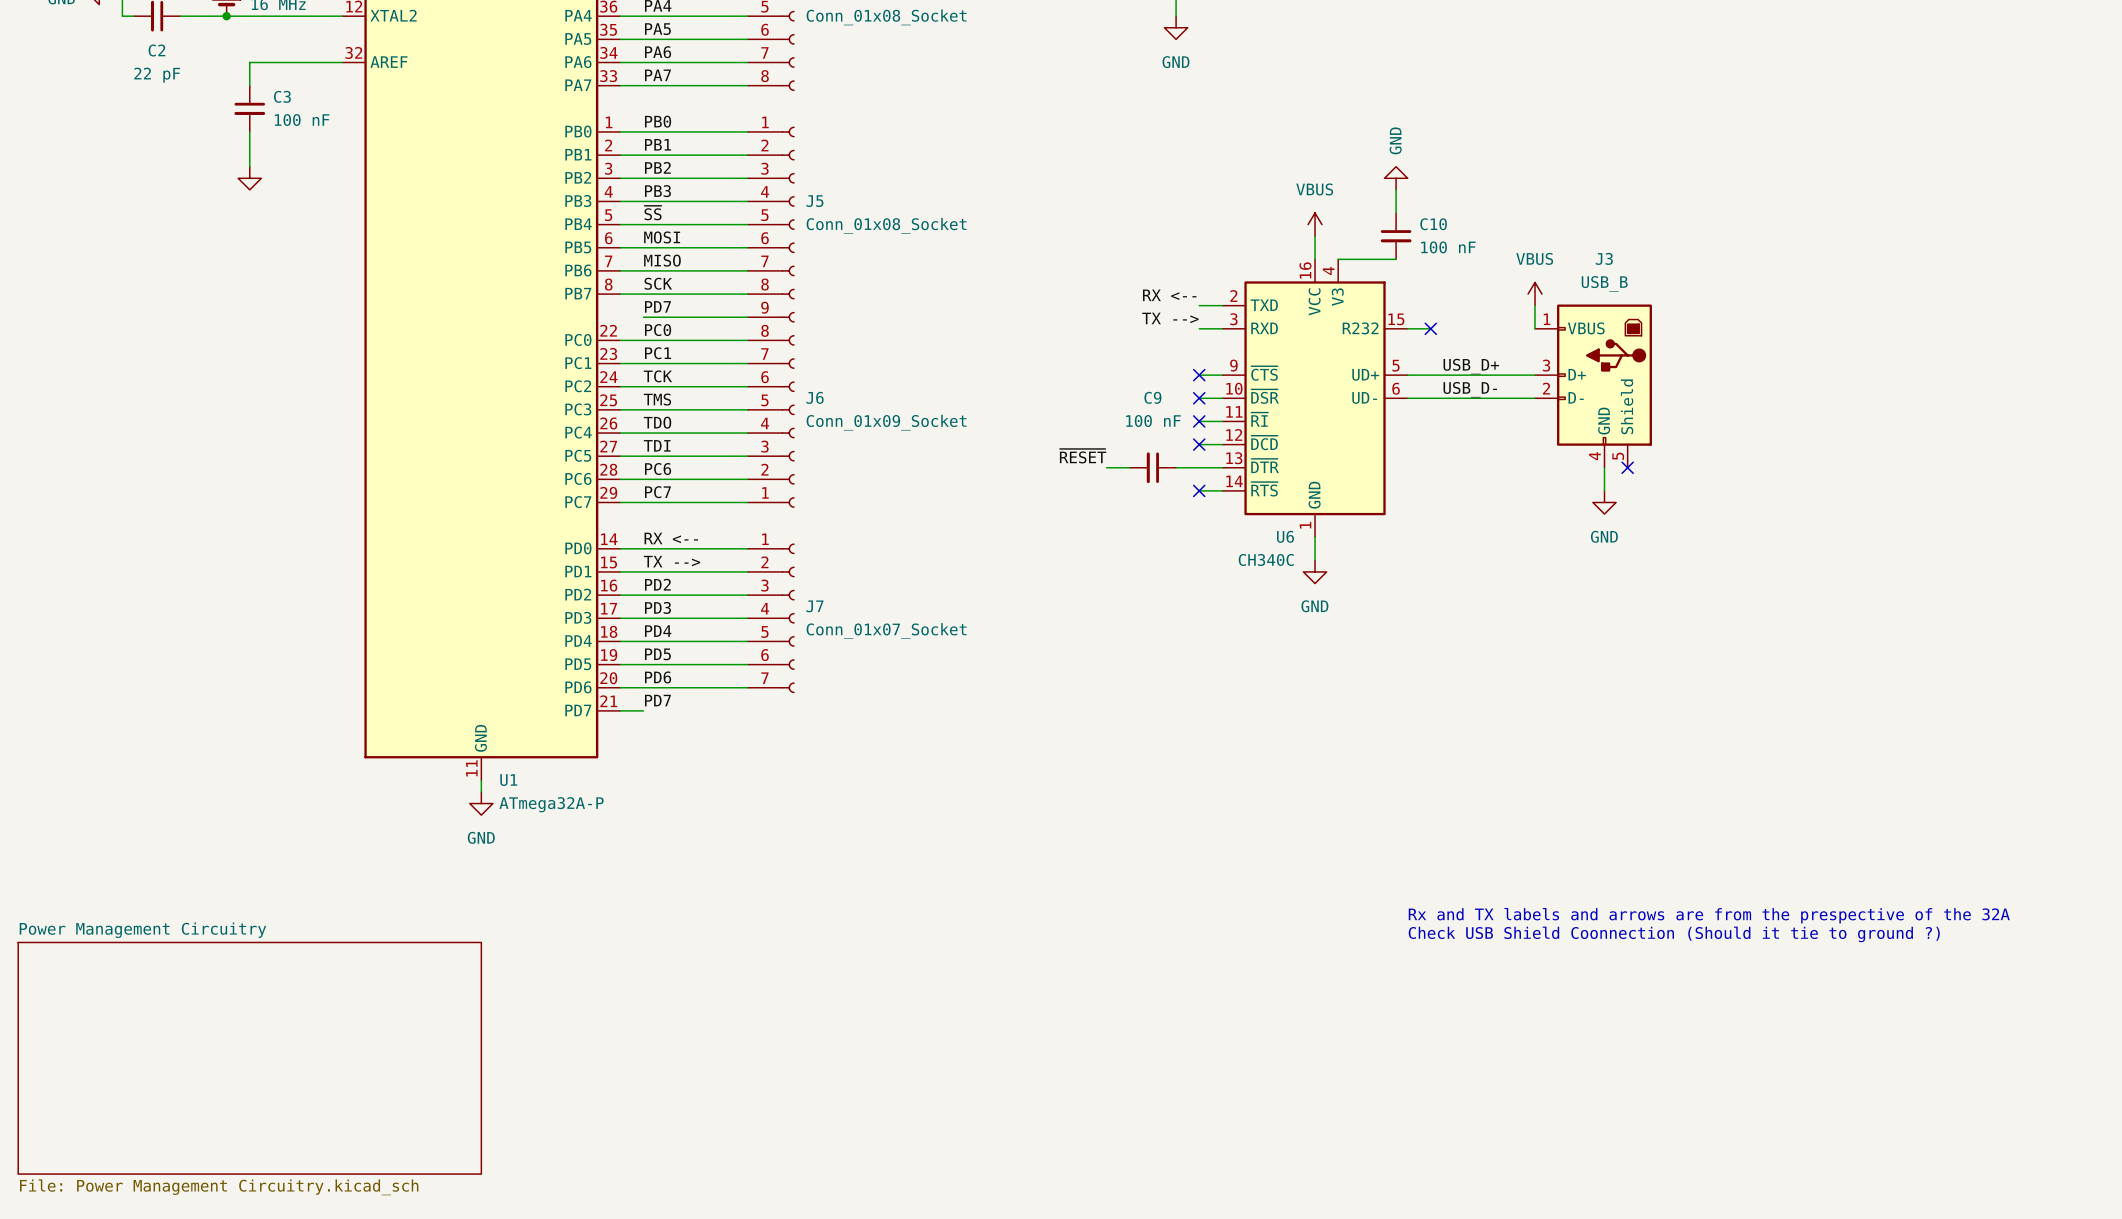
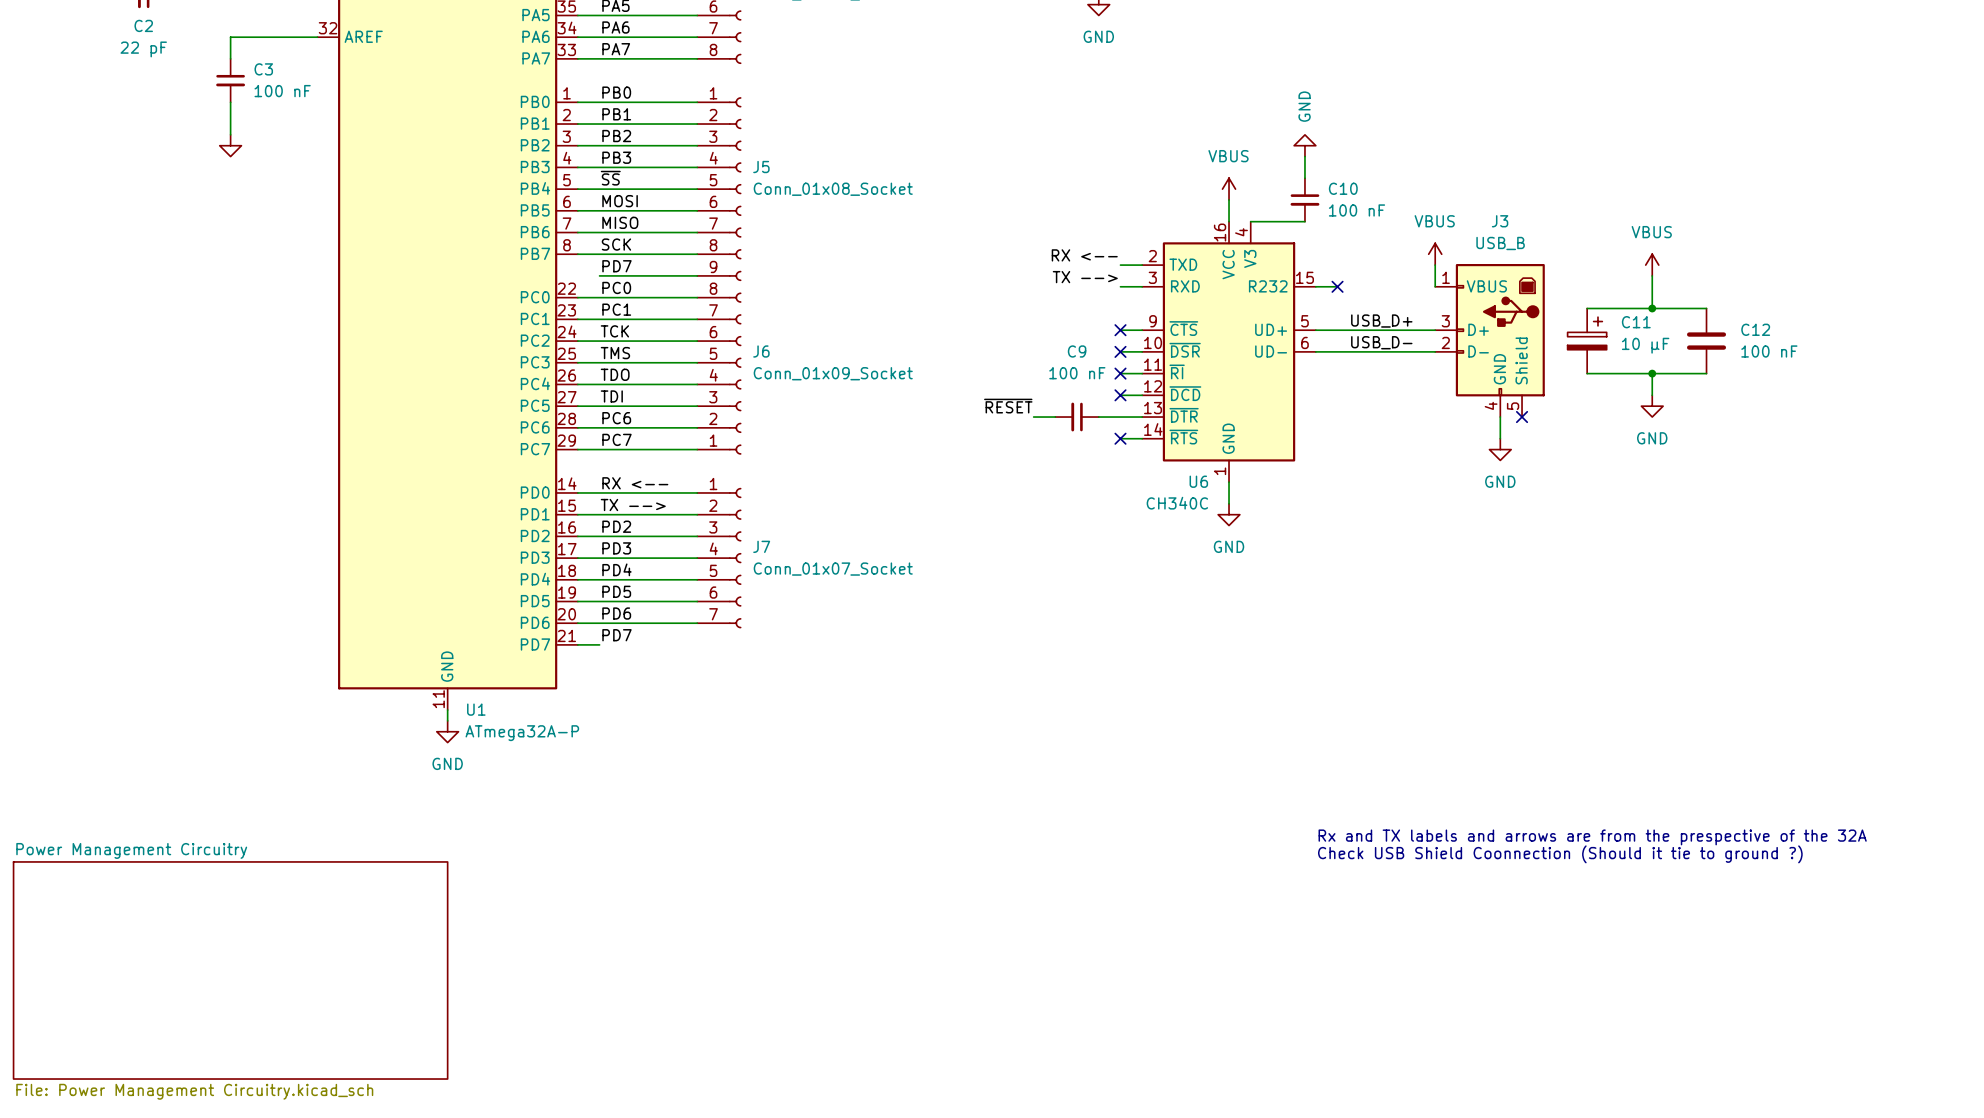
power symbol: none -> VBUS (1652, 265)
wire: none -> (1652, 275) (1652, 308)
wire: none -> (1587, 308) (1706, 308)
junction: none -> (1652, 308)
C11: none -> 10 µF (1587, 341)
C12: none -> 100 nF (1706, 341)
wire: none -> (1587, 373) (1706, 373)
wire: none -> (1652, 373) (1652, 395)
junction: none -> (1652, 373)
power symbol: none -> GND (1652, 406)

